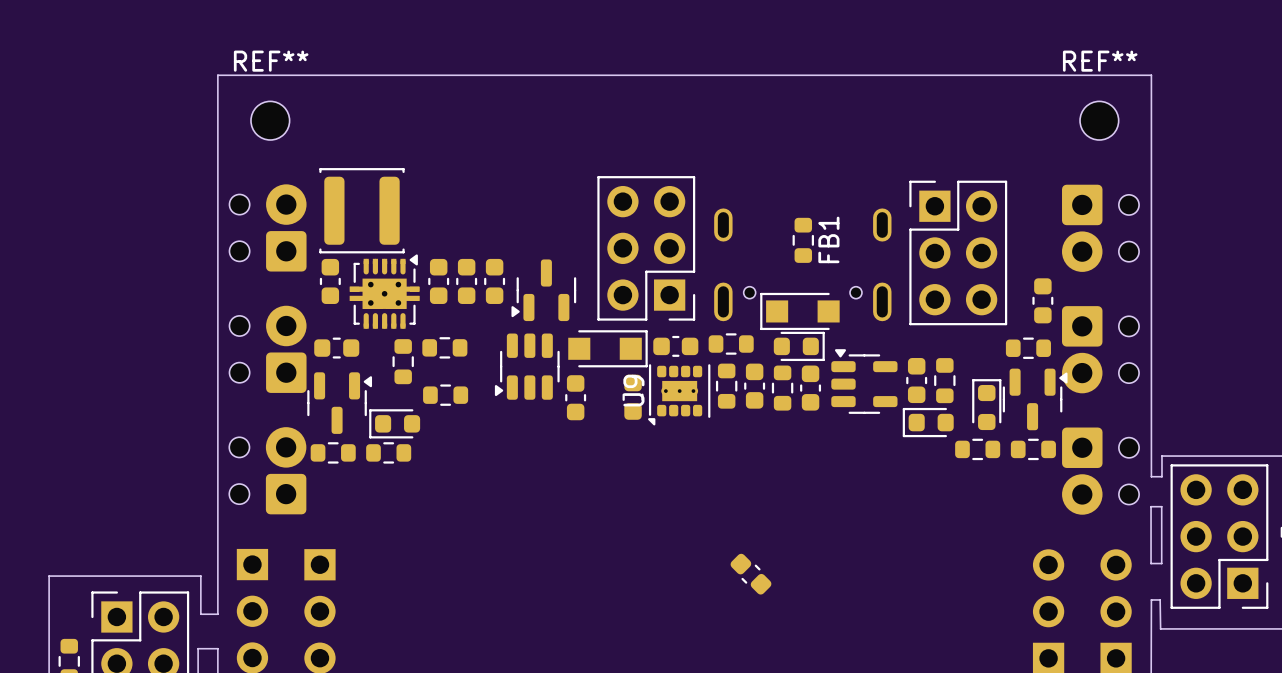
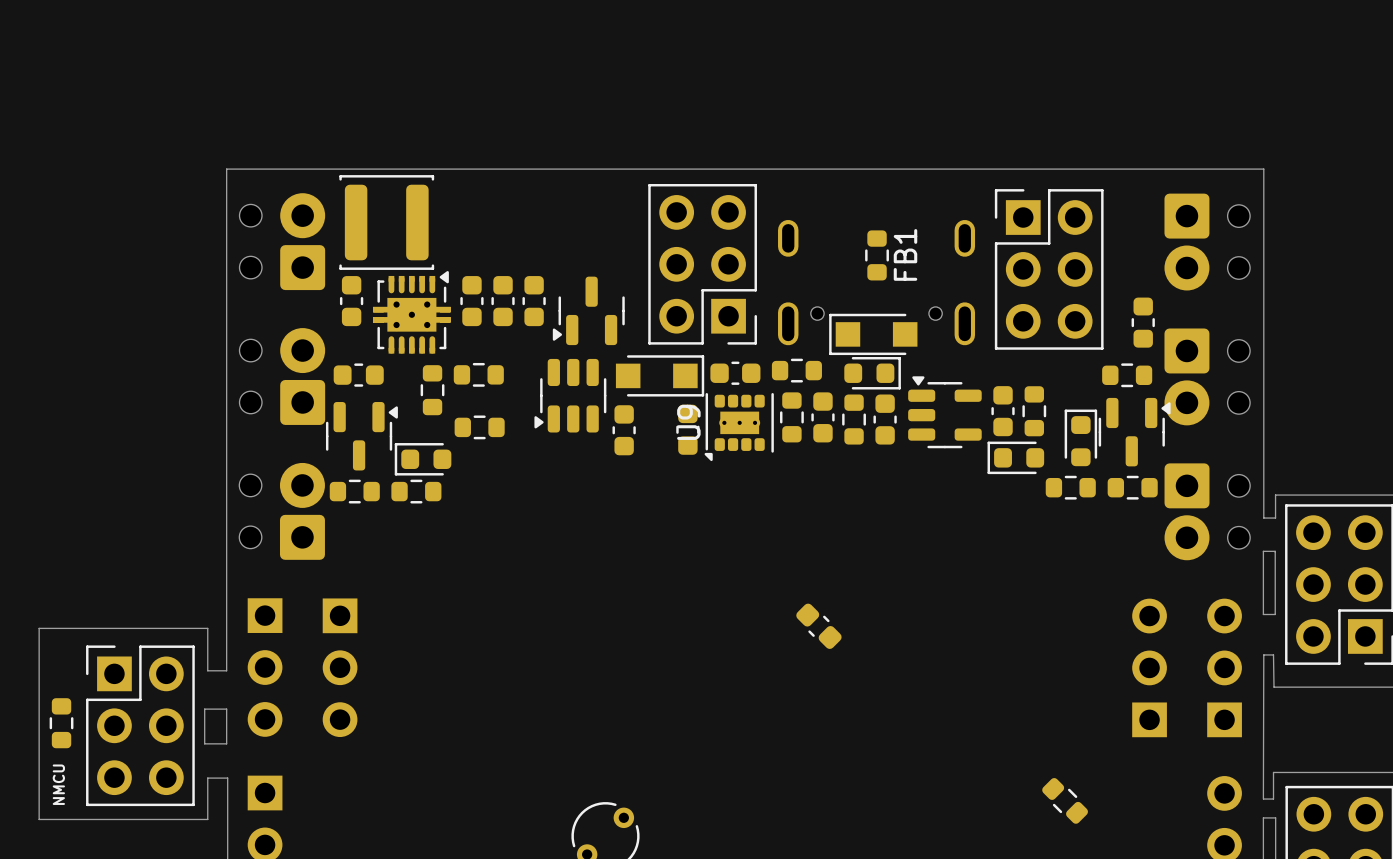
REF**: (270, 120) -> none
REF**: (1099, 120) -> none
board edge: (217, 162) (217, 75) (1151, 75) (1151, 162) -> (226, 169) (1263, 169)

